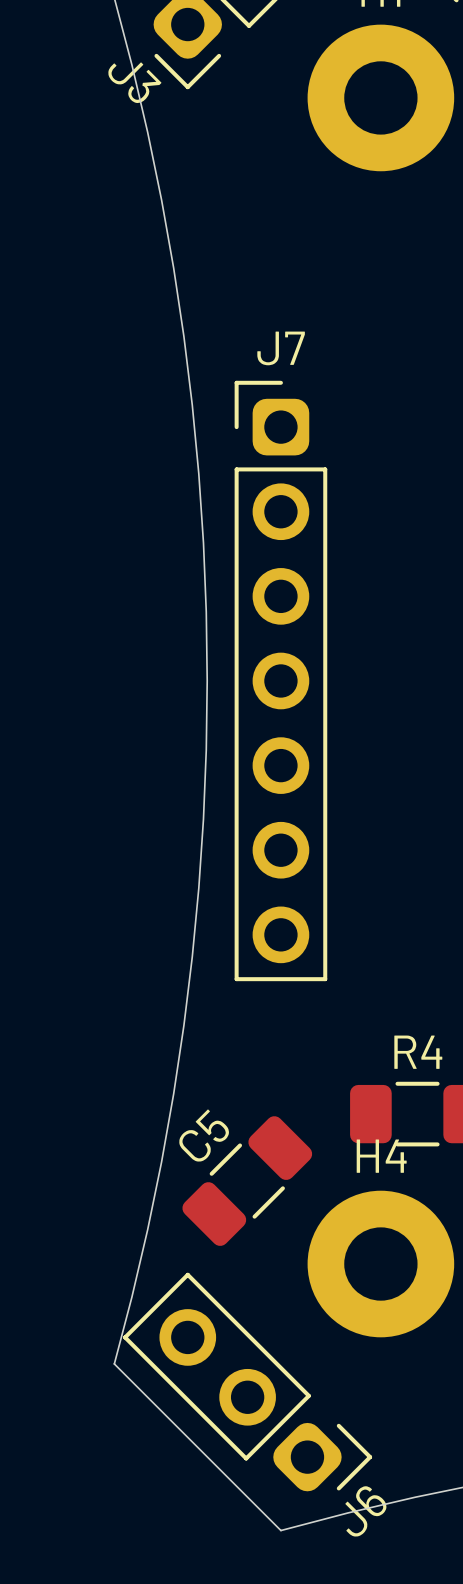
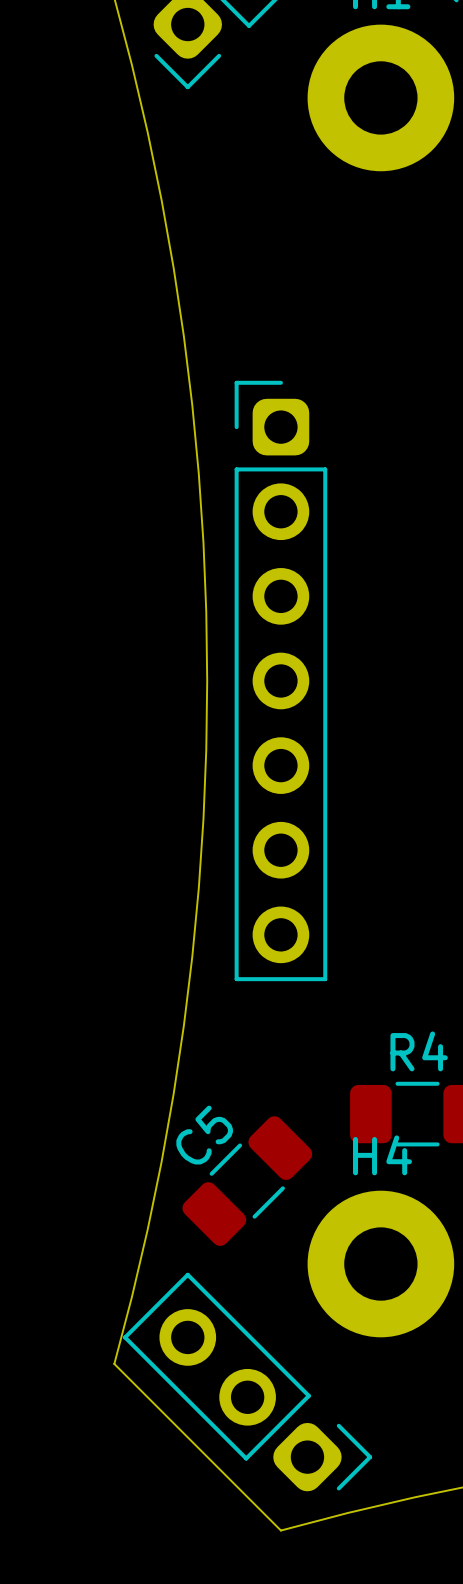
J3 name: J3 (134, 82) -> none
J7 name: J7 (281, 348) -> none
J6 name: J6 (365, 1511) -> none

